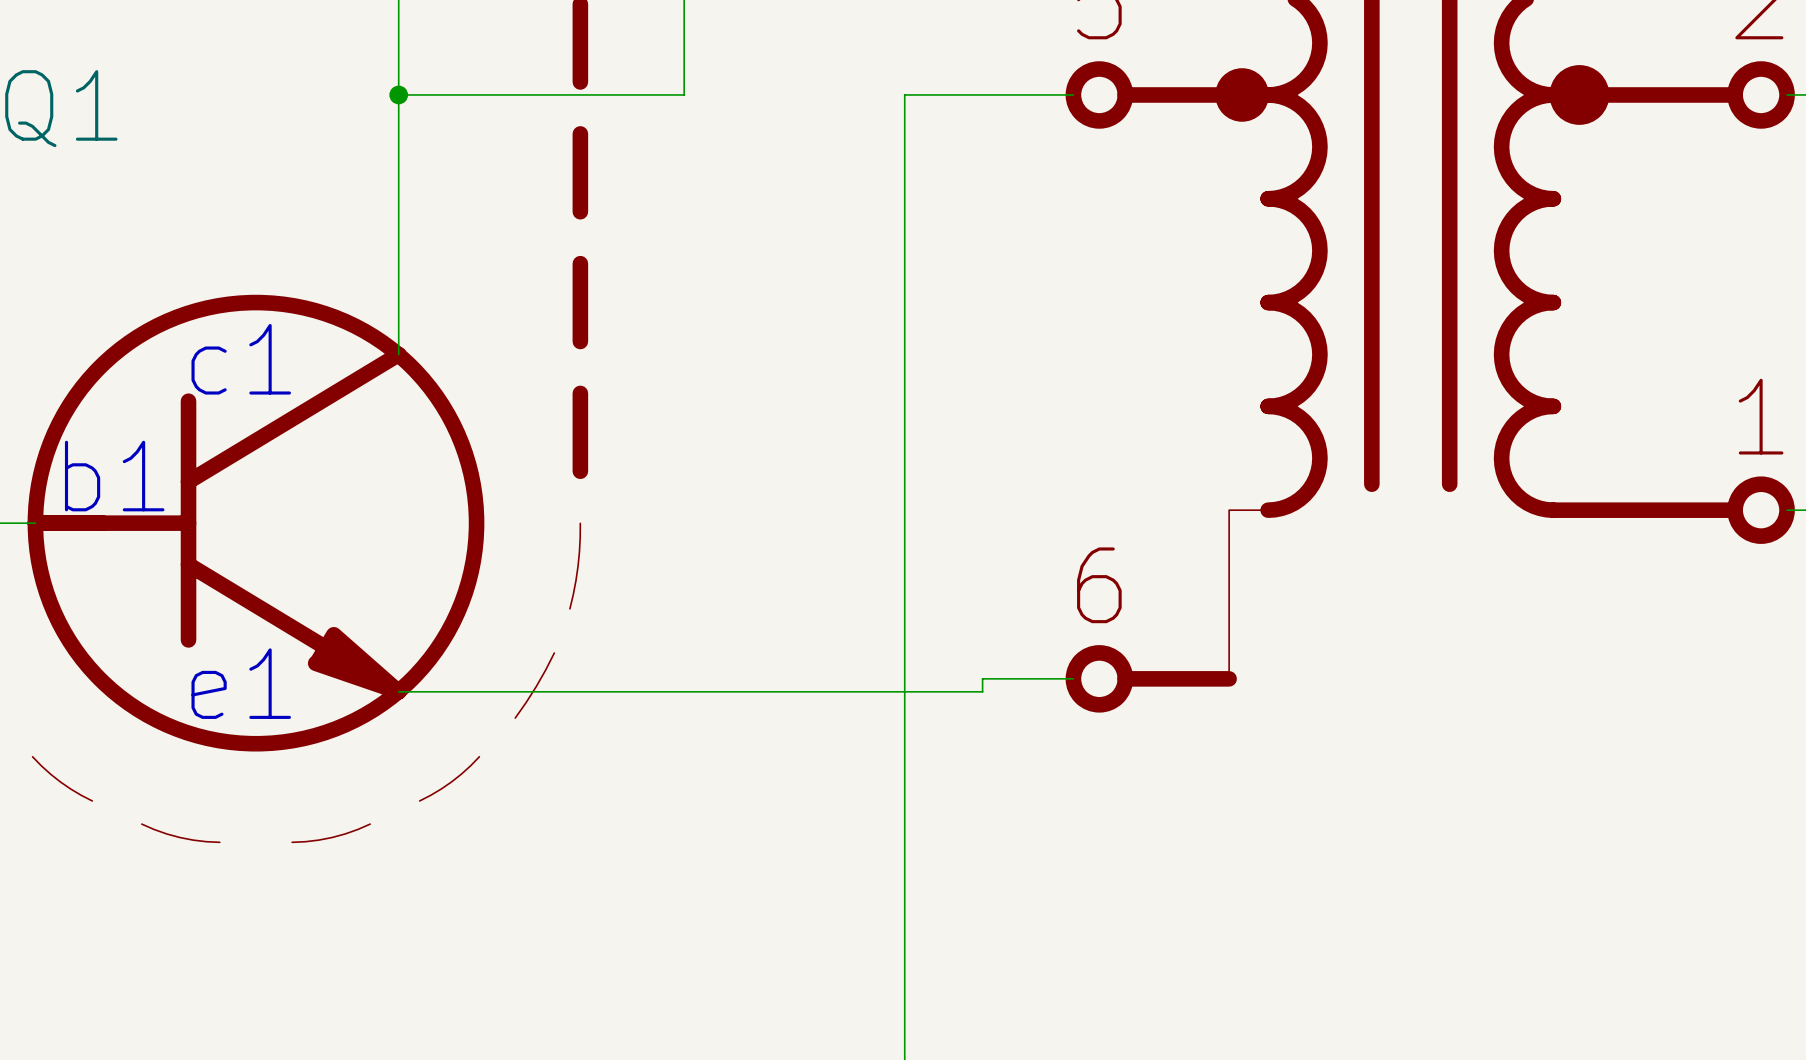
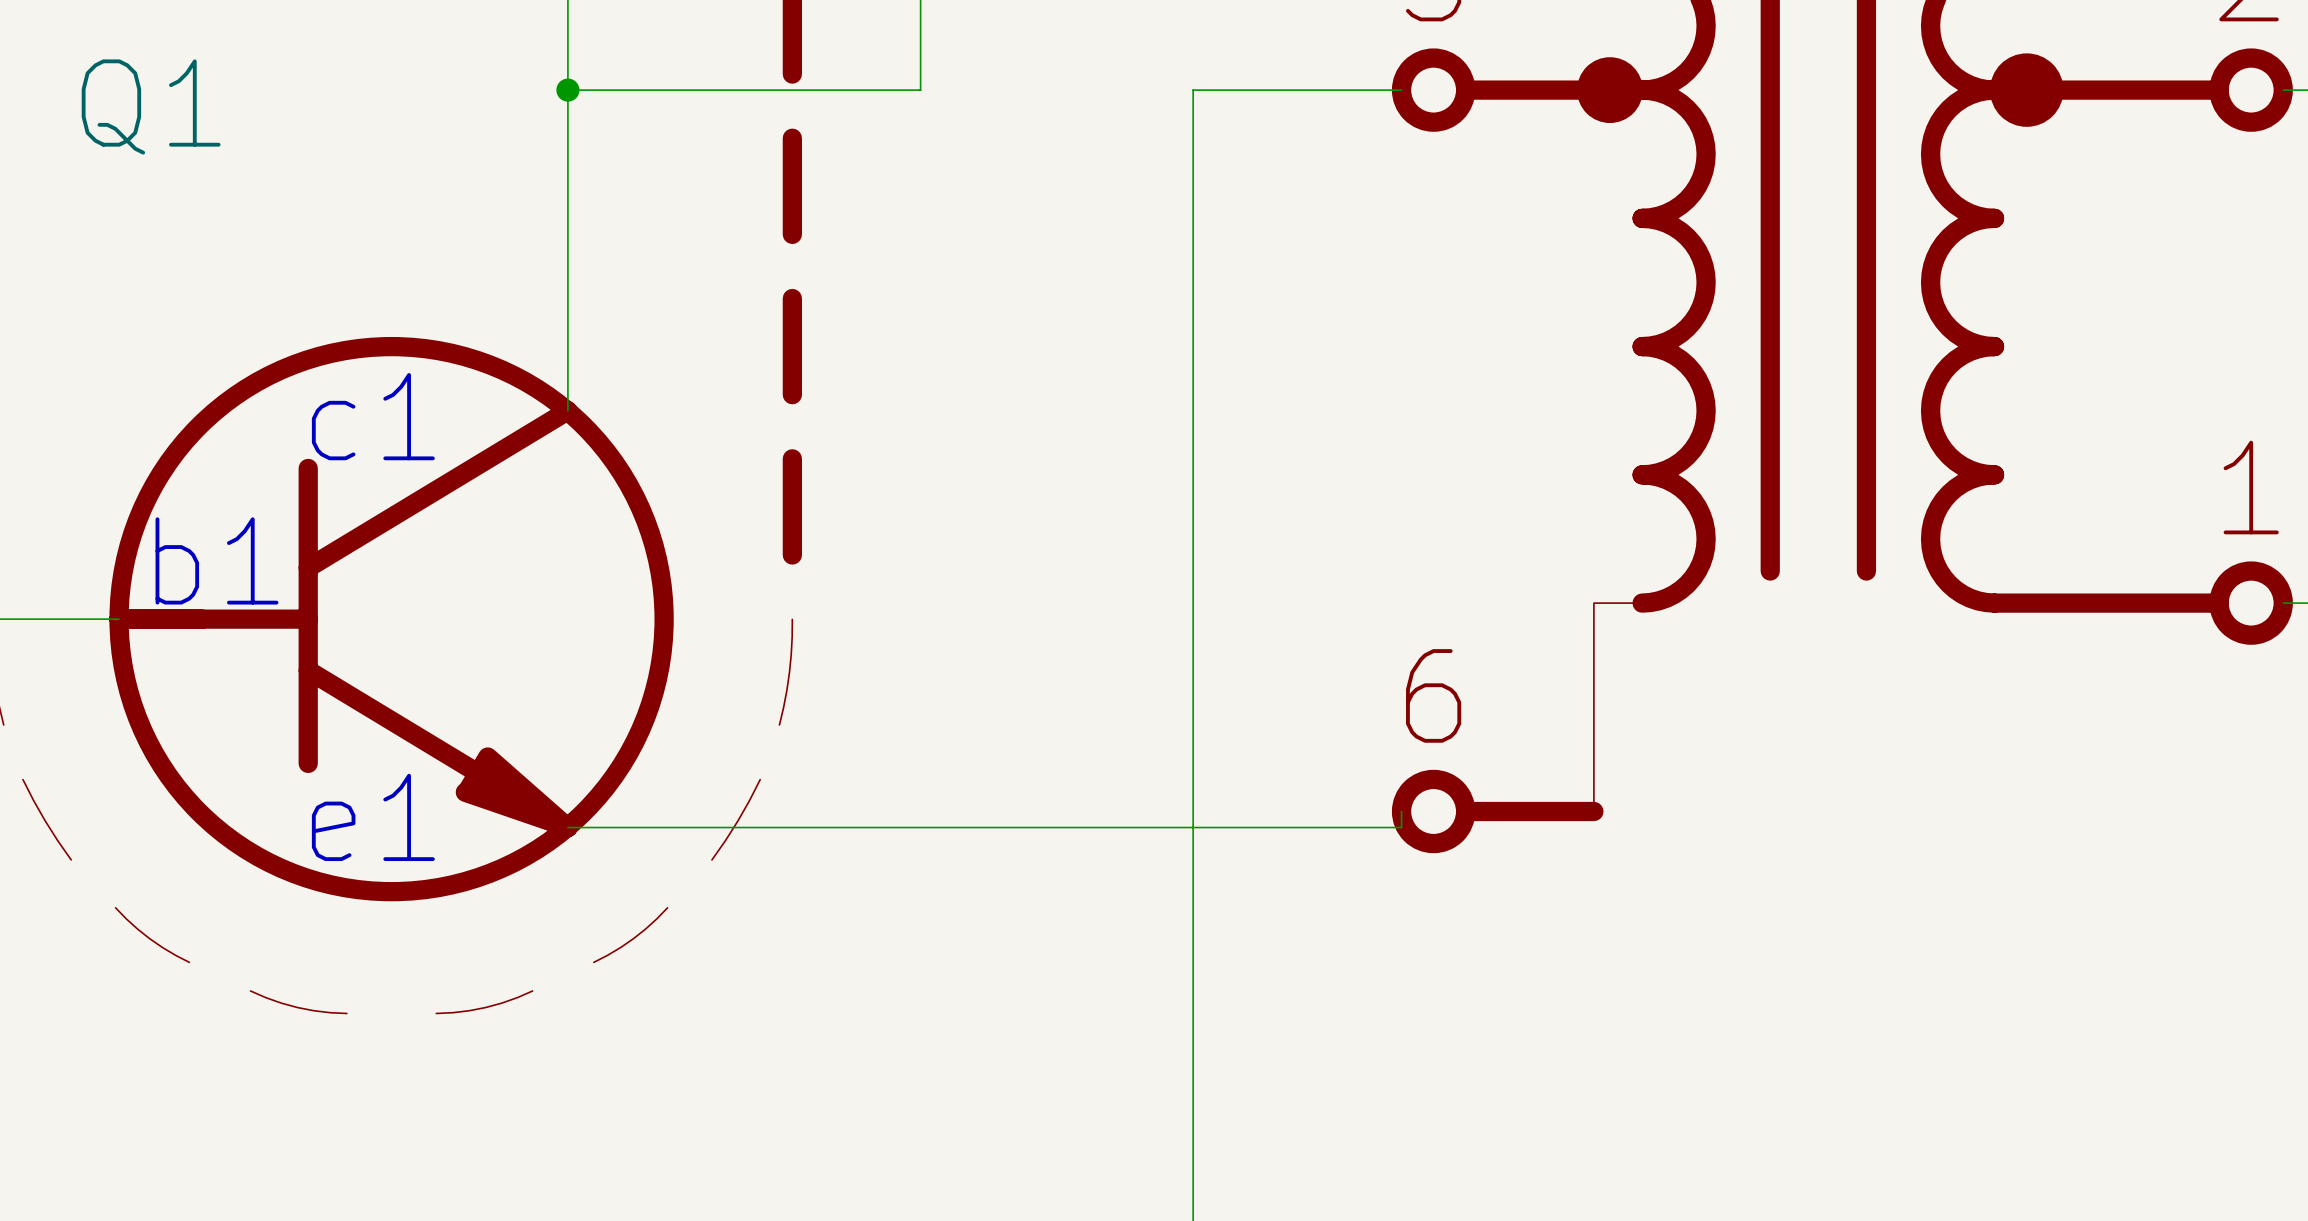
wire: (1073, 678) (982, 678) (982, 691) -> (1401, 811) (1401, 827) (1289, 827)

